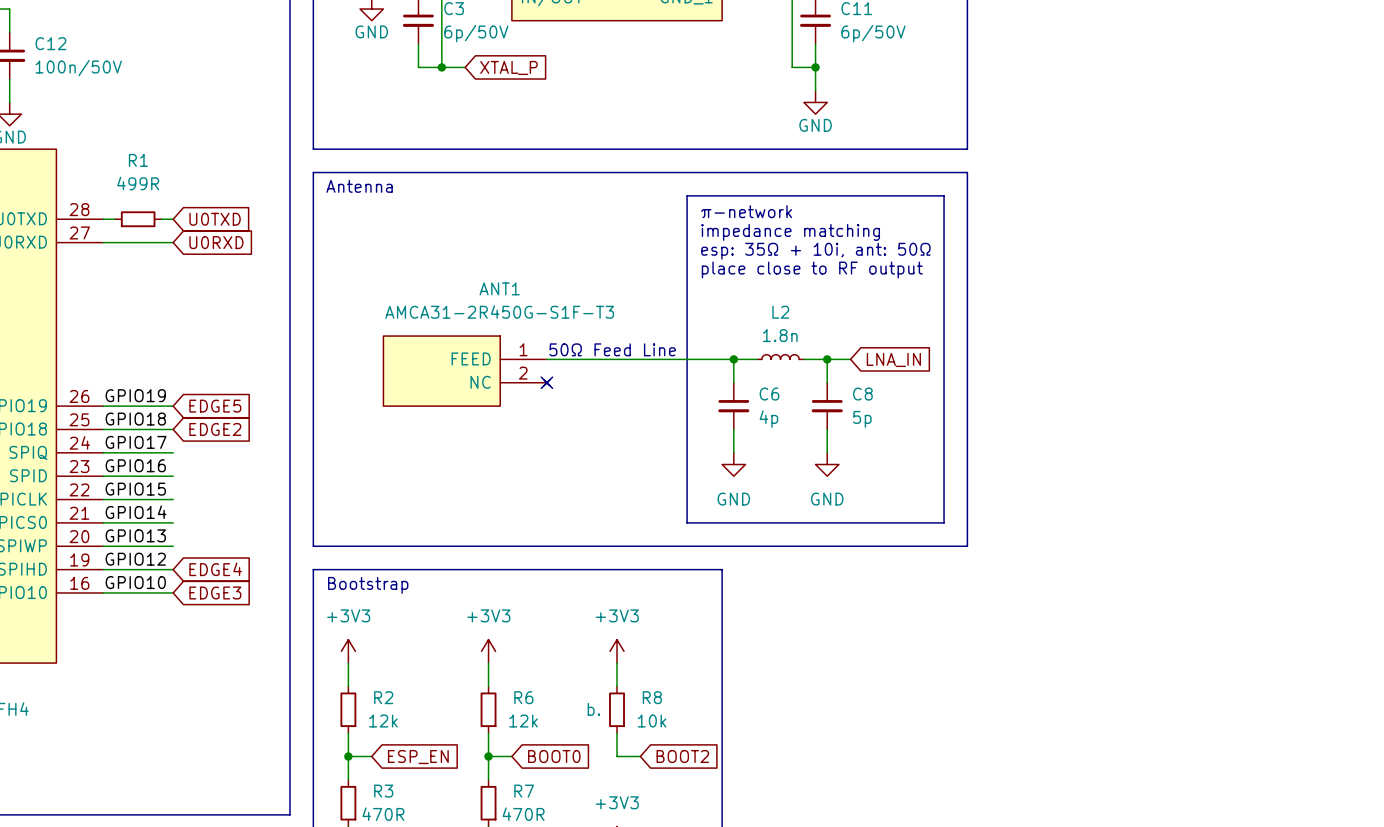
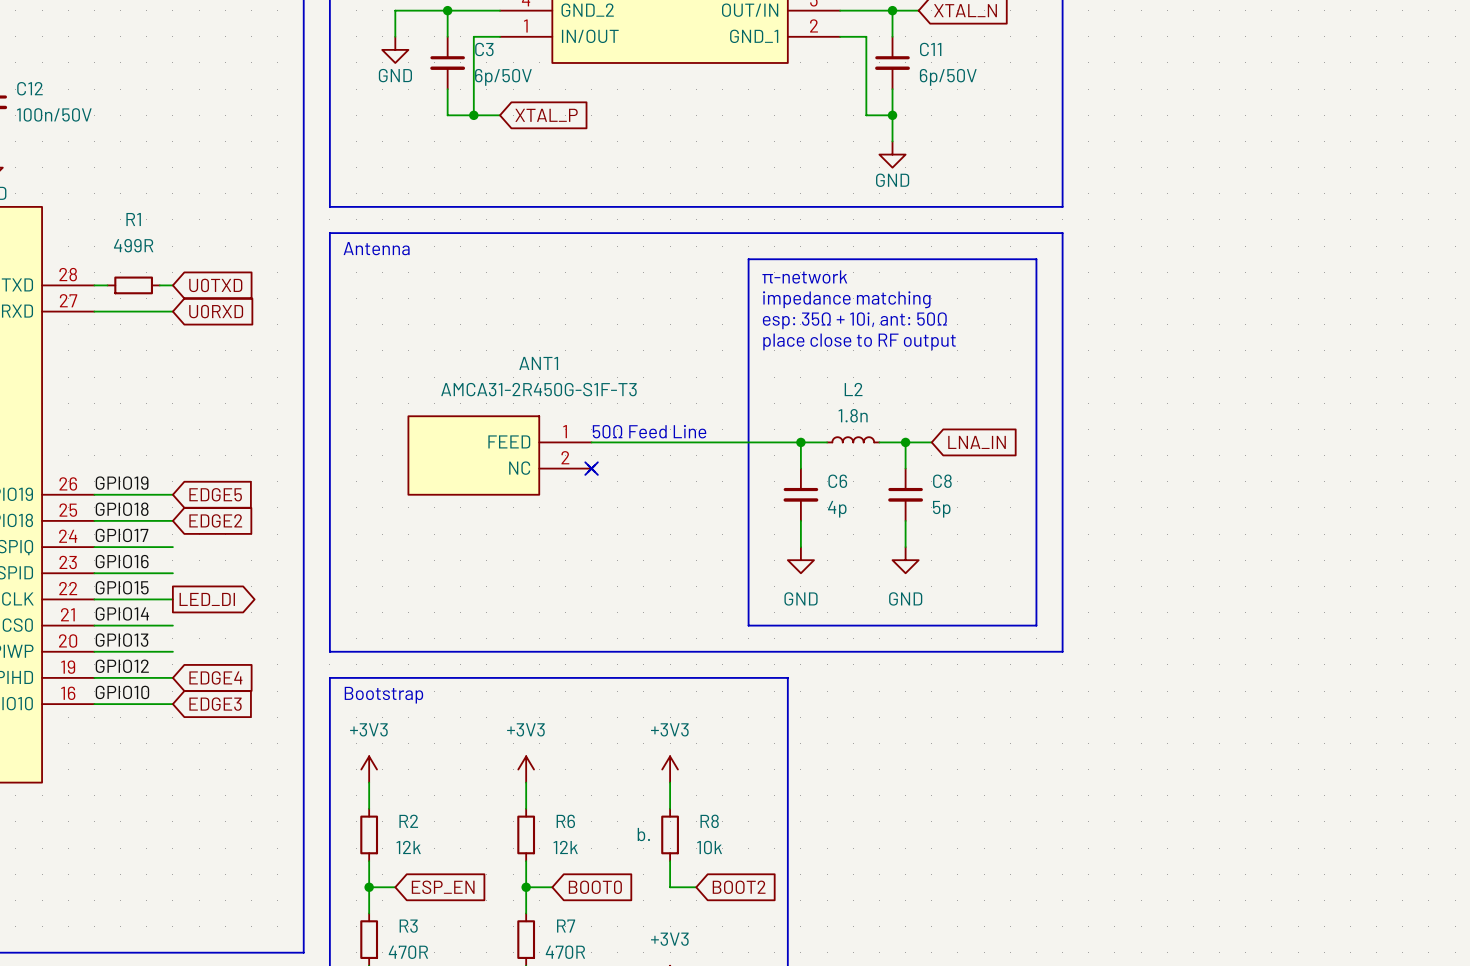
global label: none -> LED_DI (207, 599)

